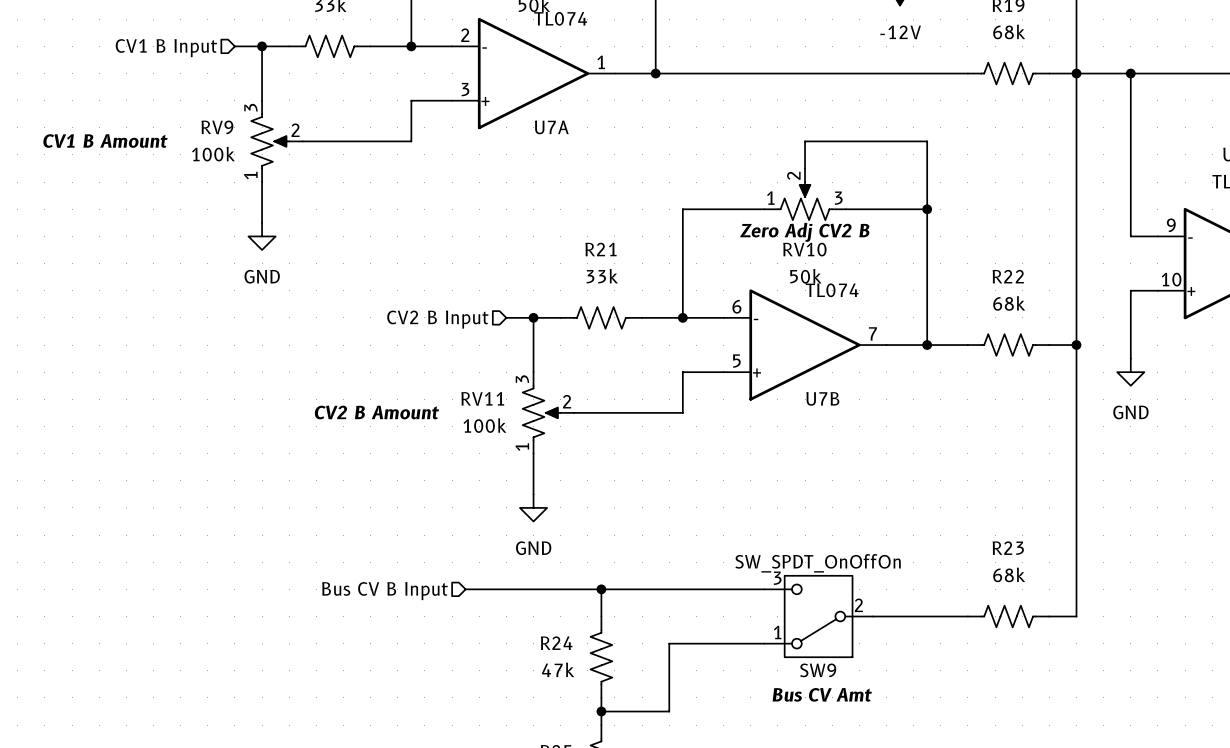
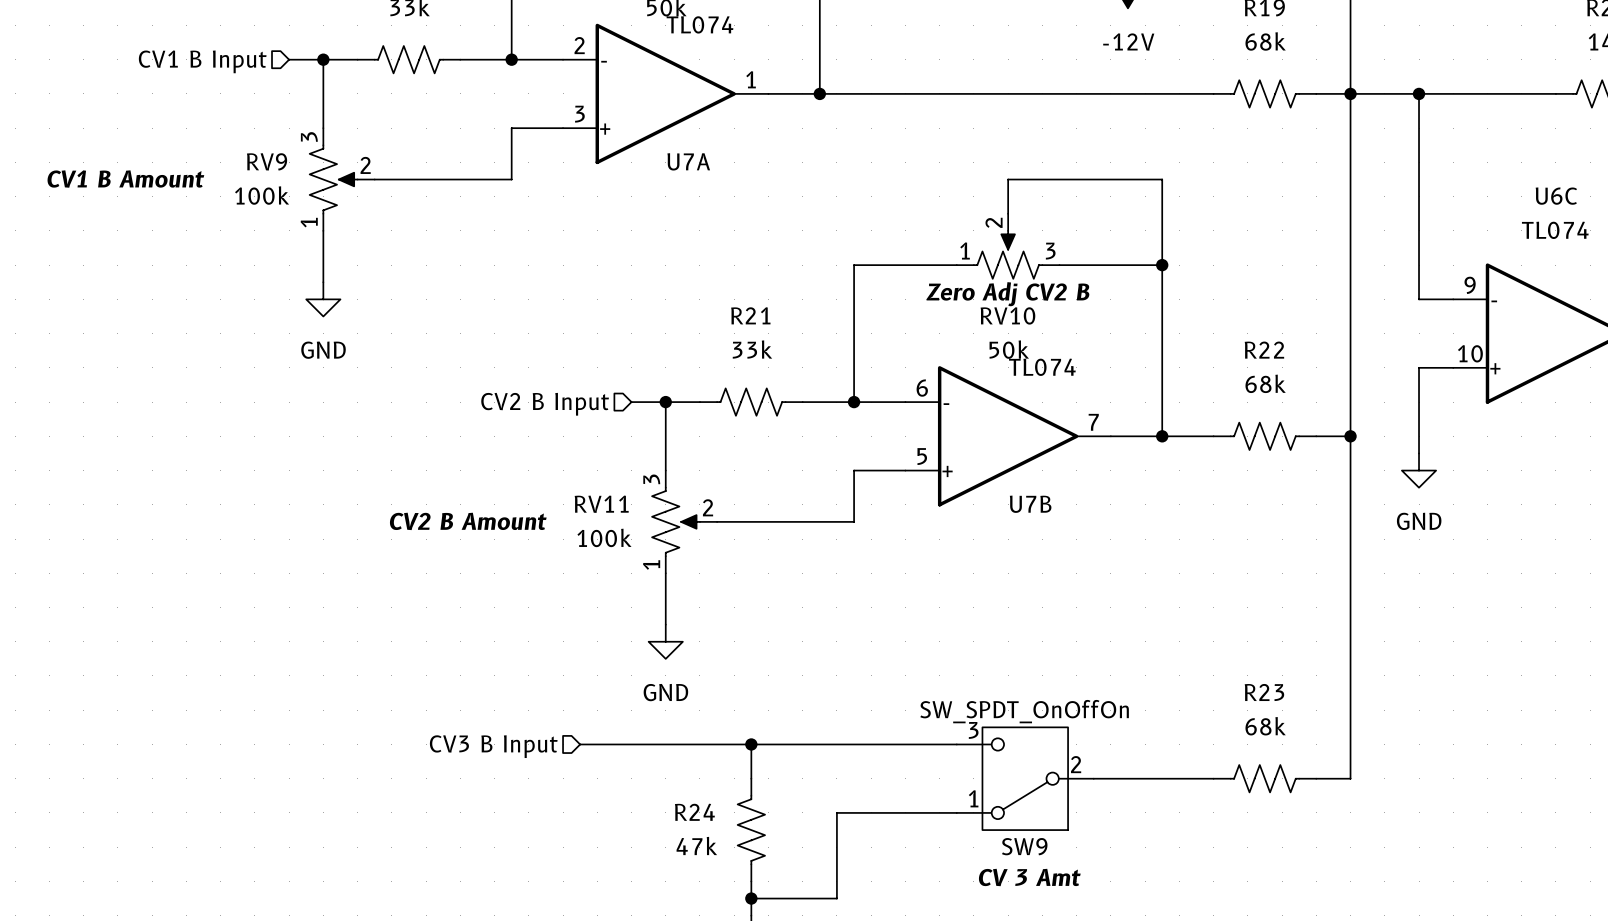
hierarchical label: Bus CV B Input (384, 591) -> CV3 B Input (493, 746)
SW9 text: Bus CV Amt (822, 694) -> CV 3 Amt (1029, 877)

